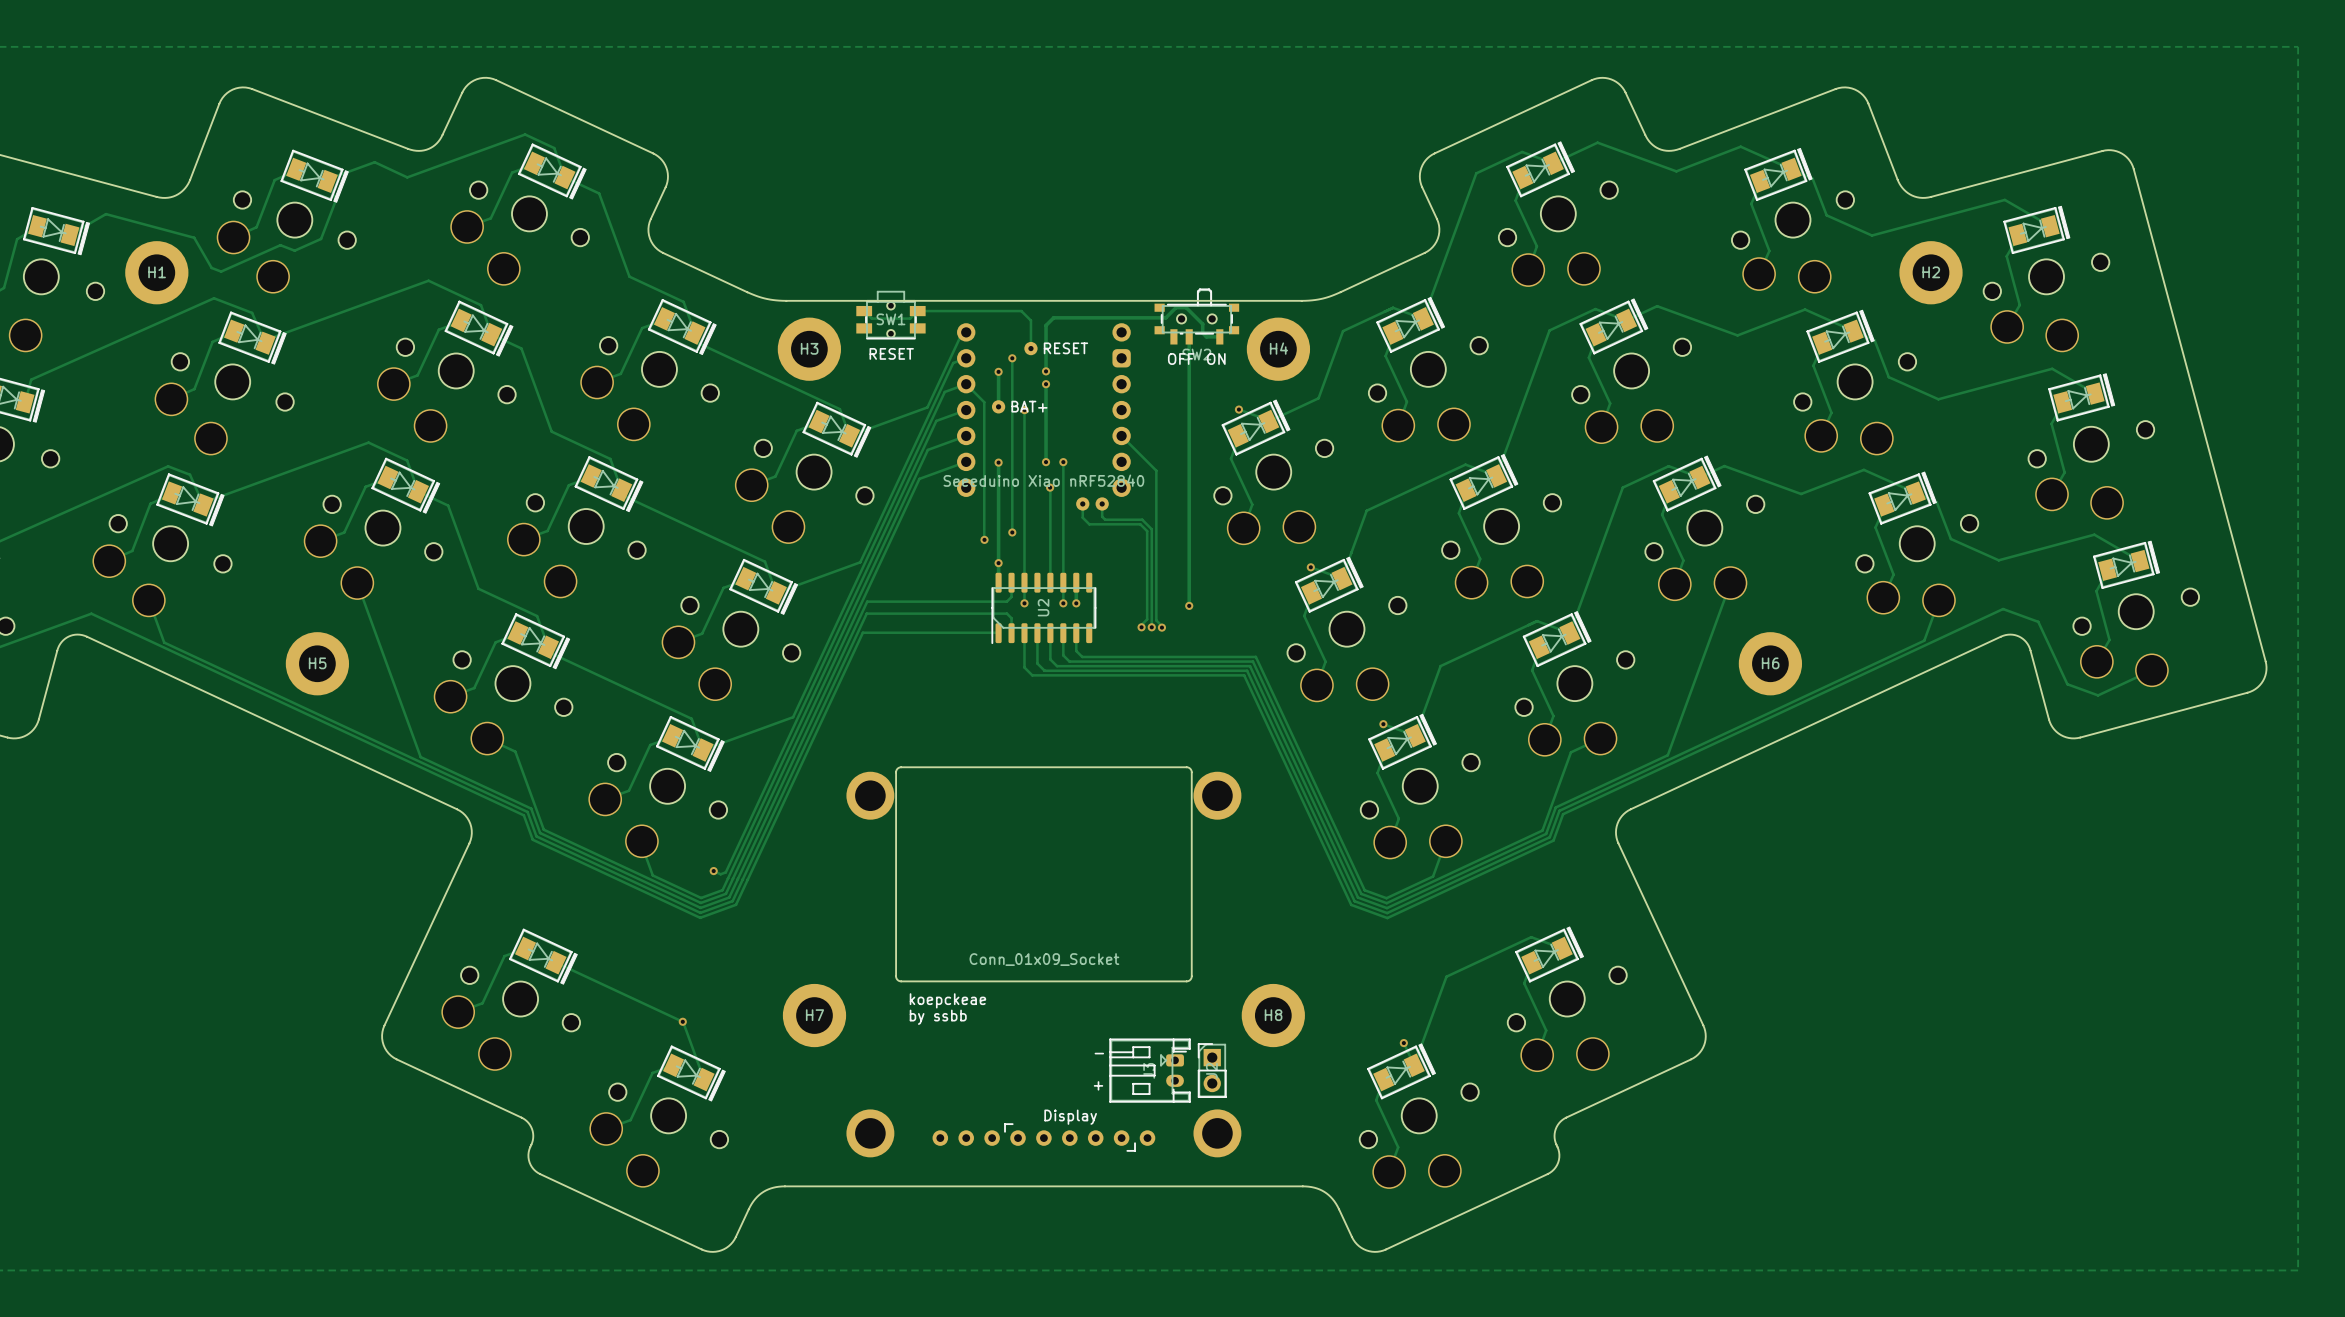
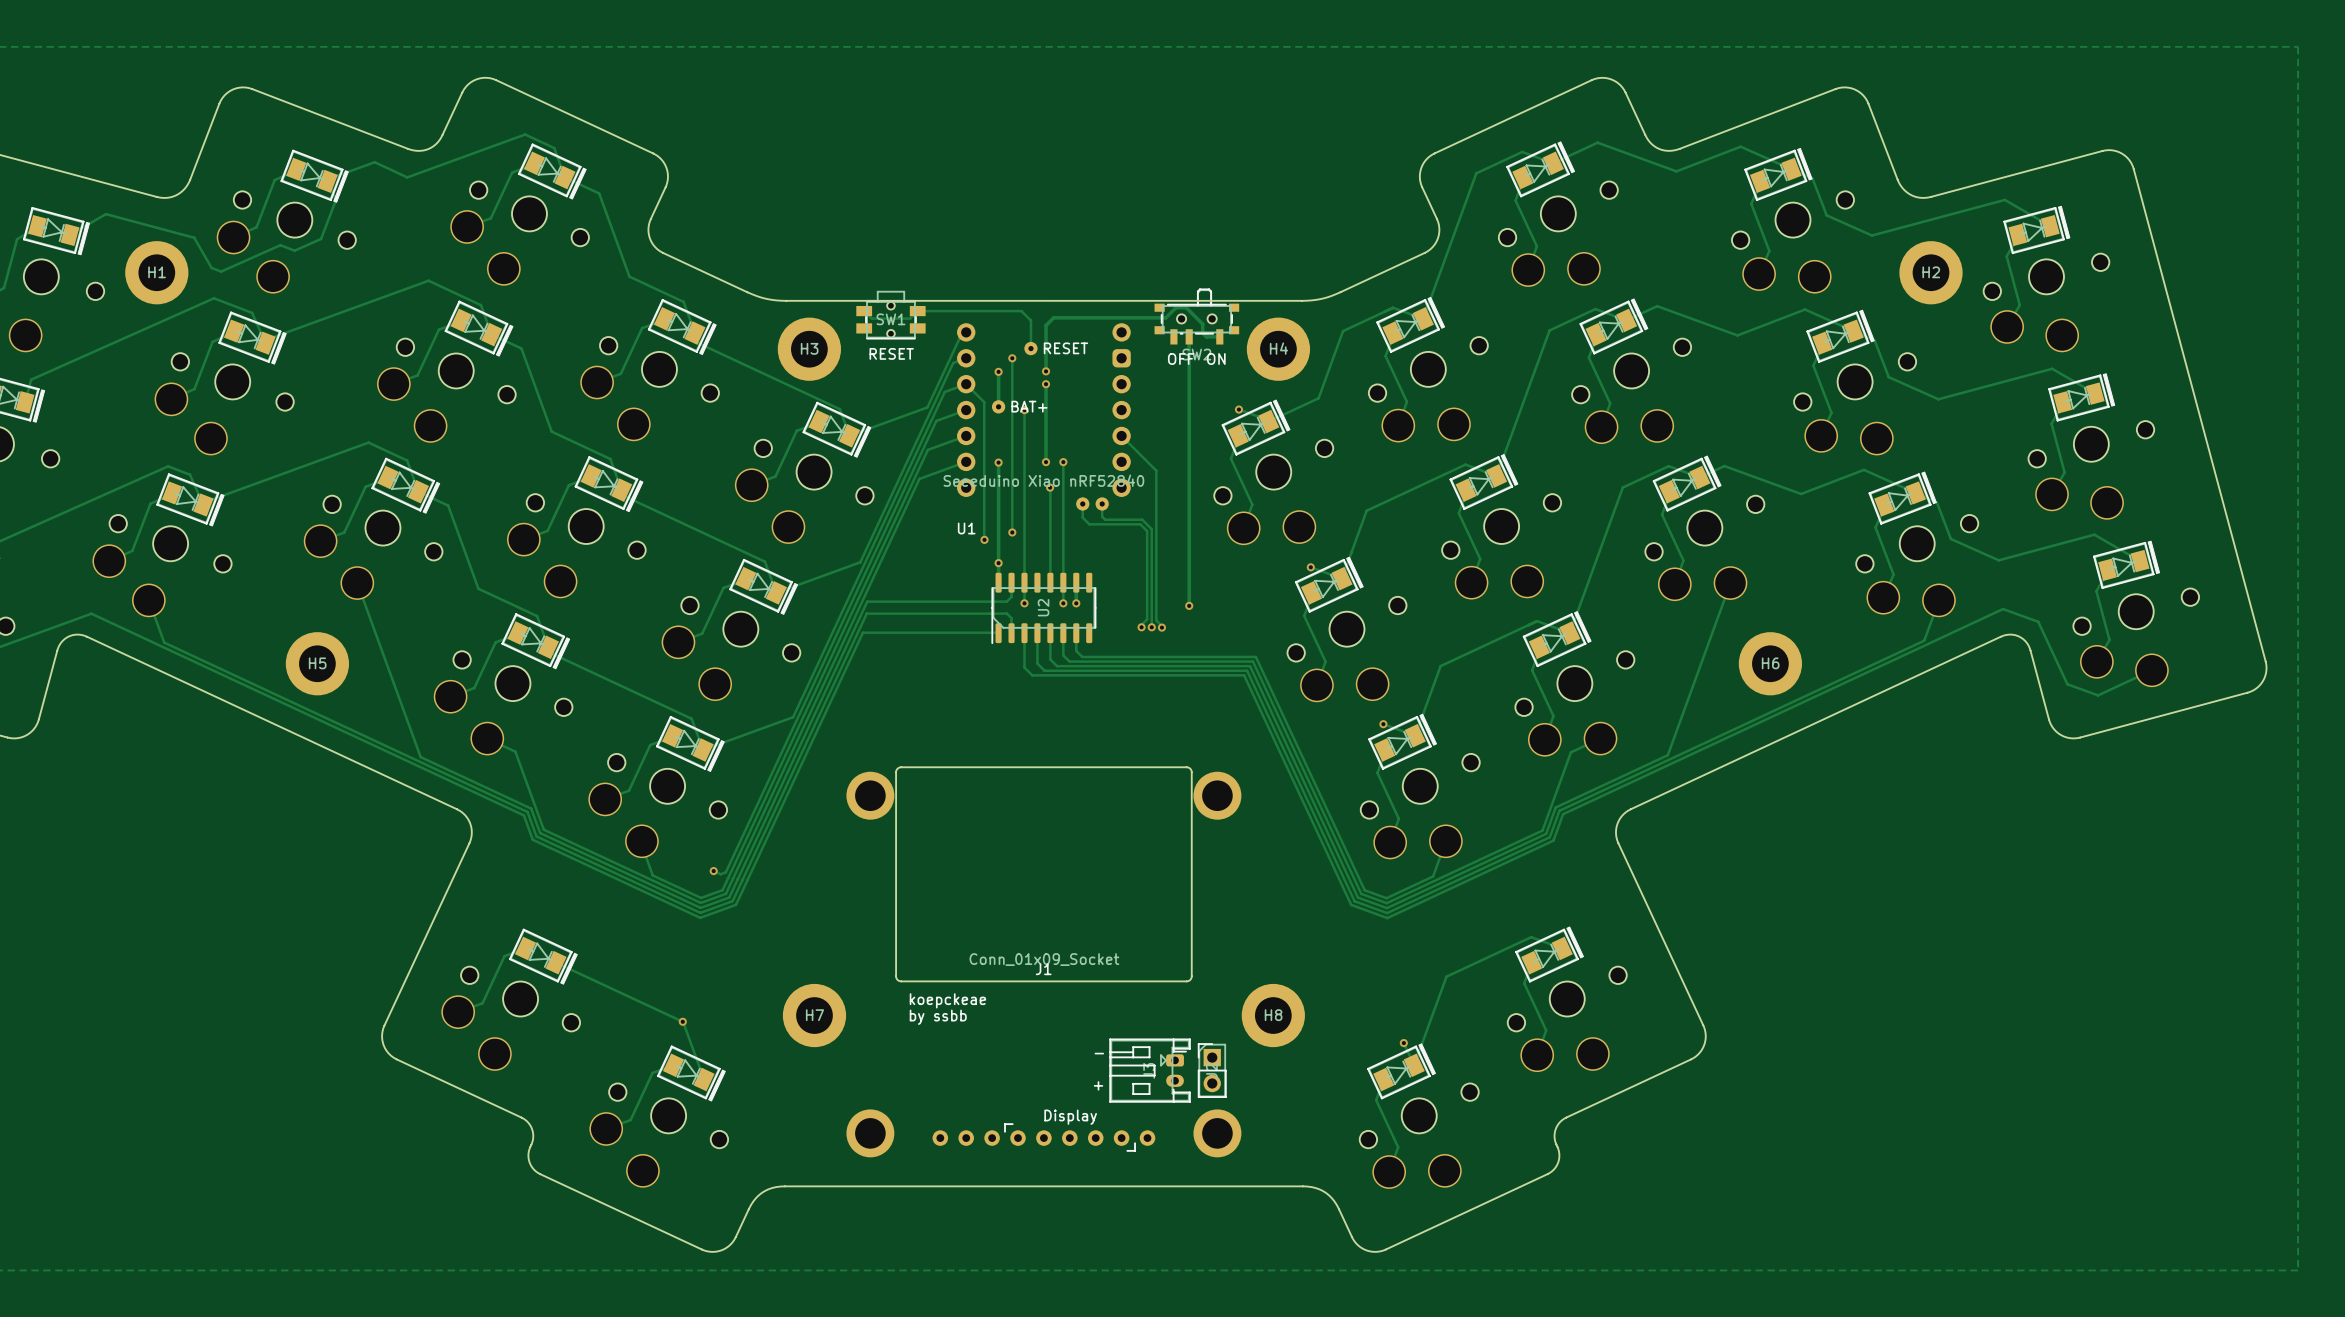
U1 name: none -> U1 (966, 528)
J1 name: none -> J1 (1043, 969)

